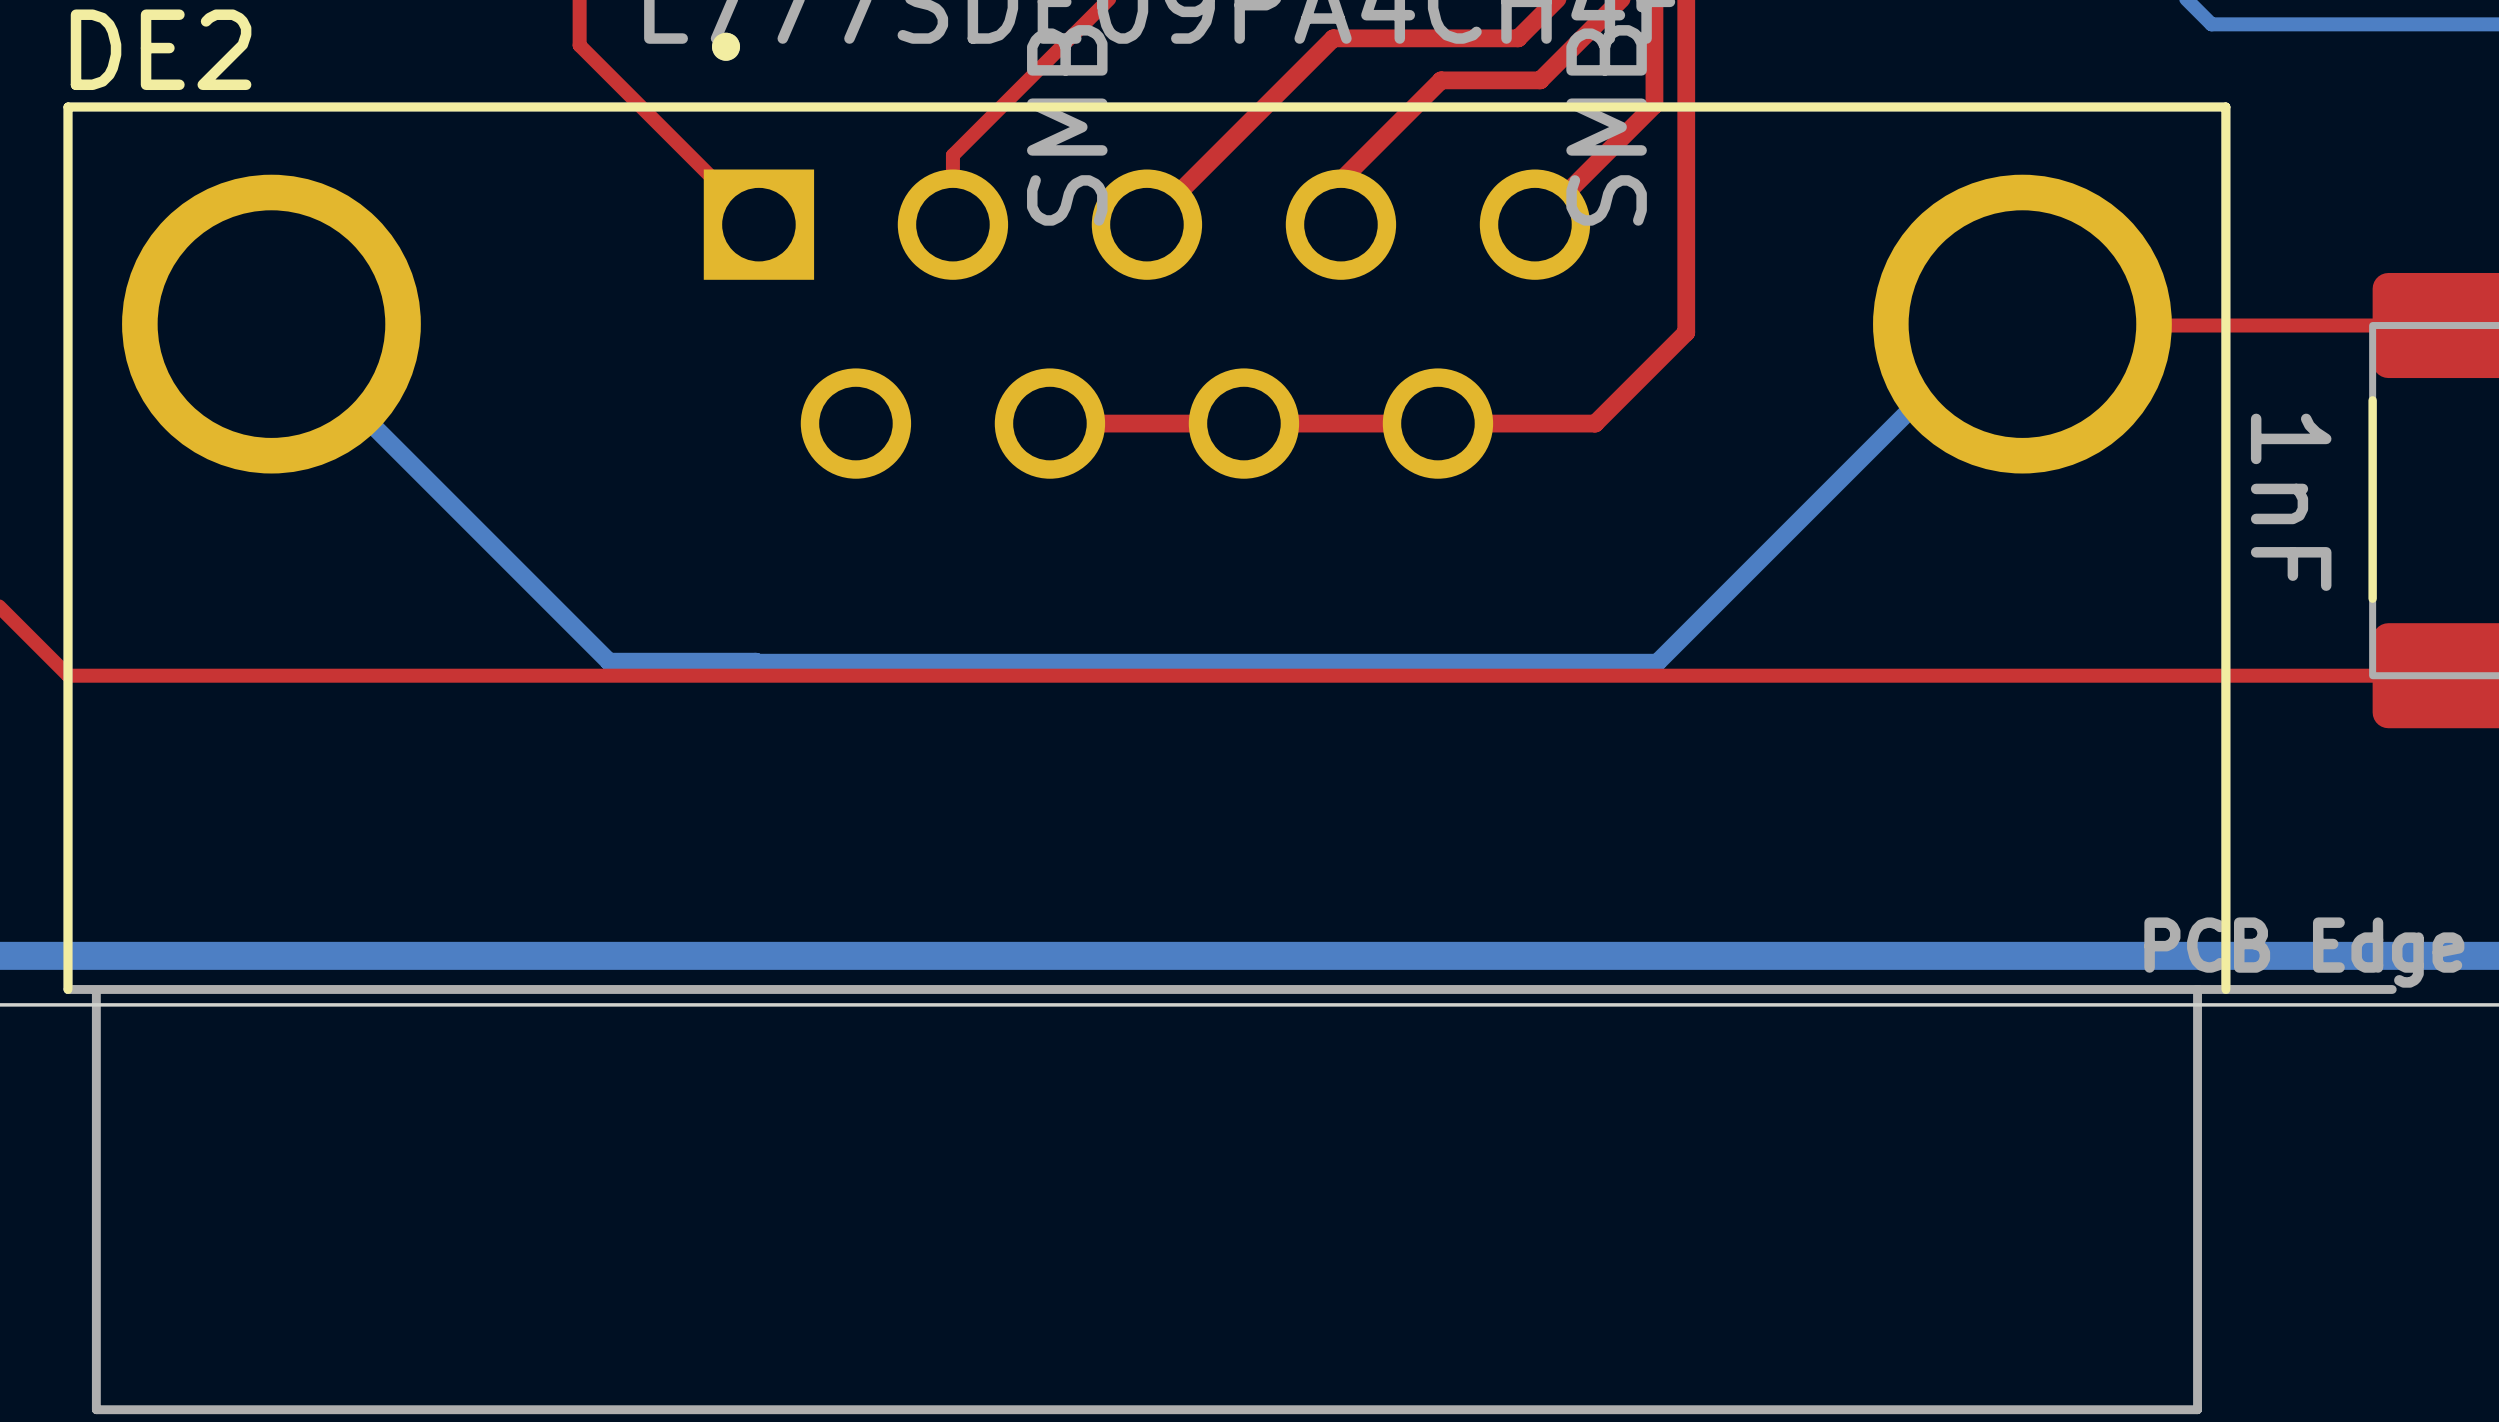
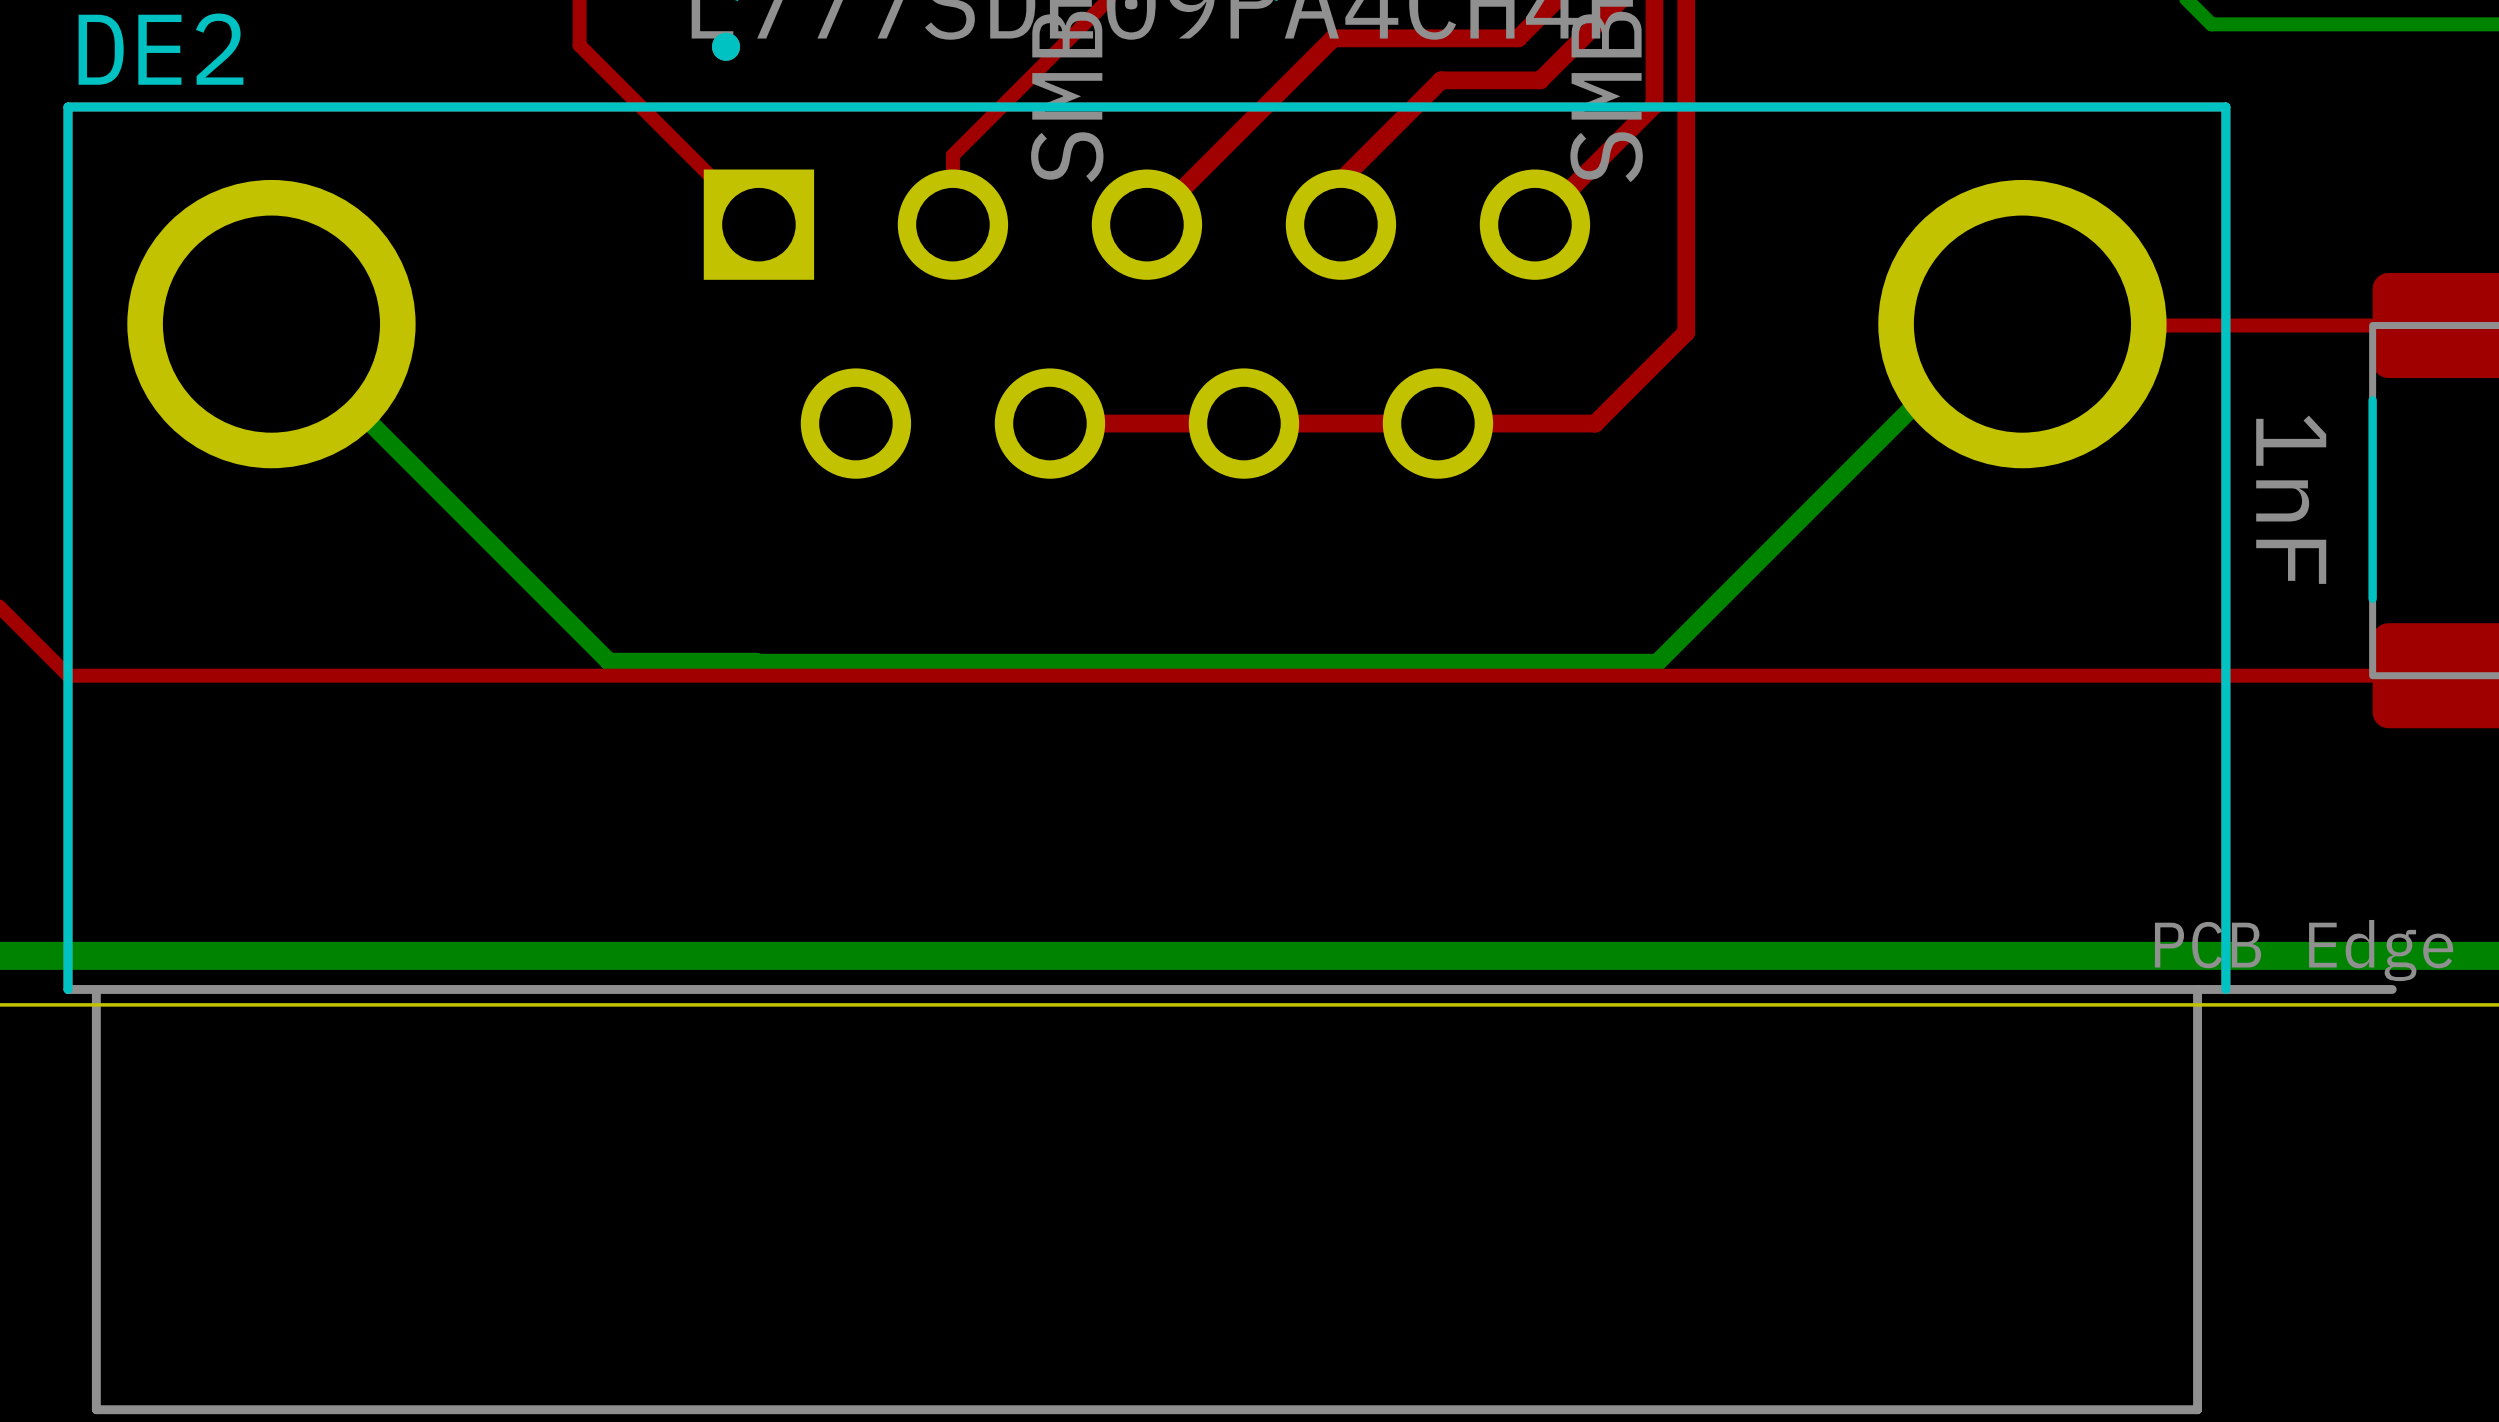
DE2 footprint: [63, 32, 2397, 1415] -> [63, 32, 2397, 1415]

